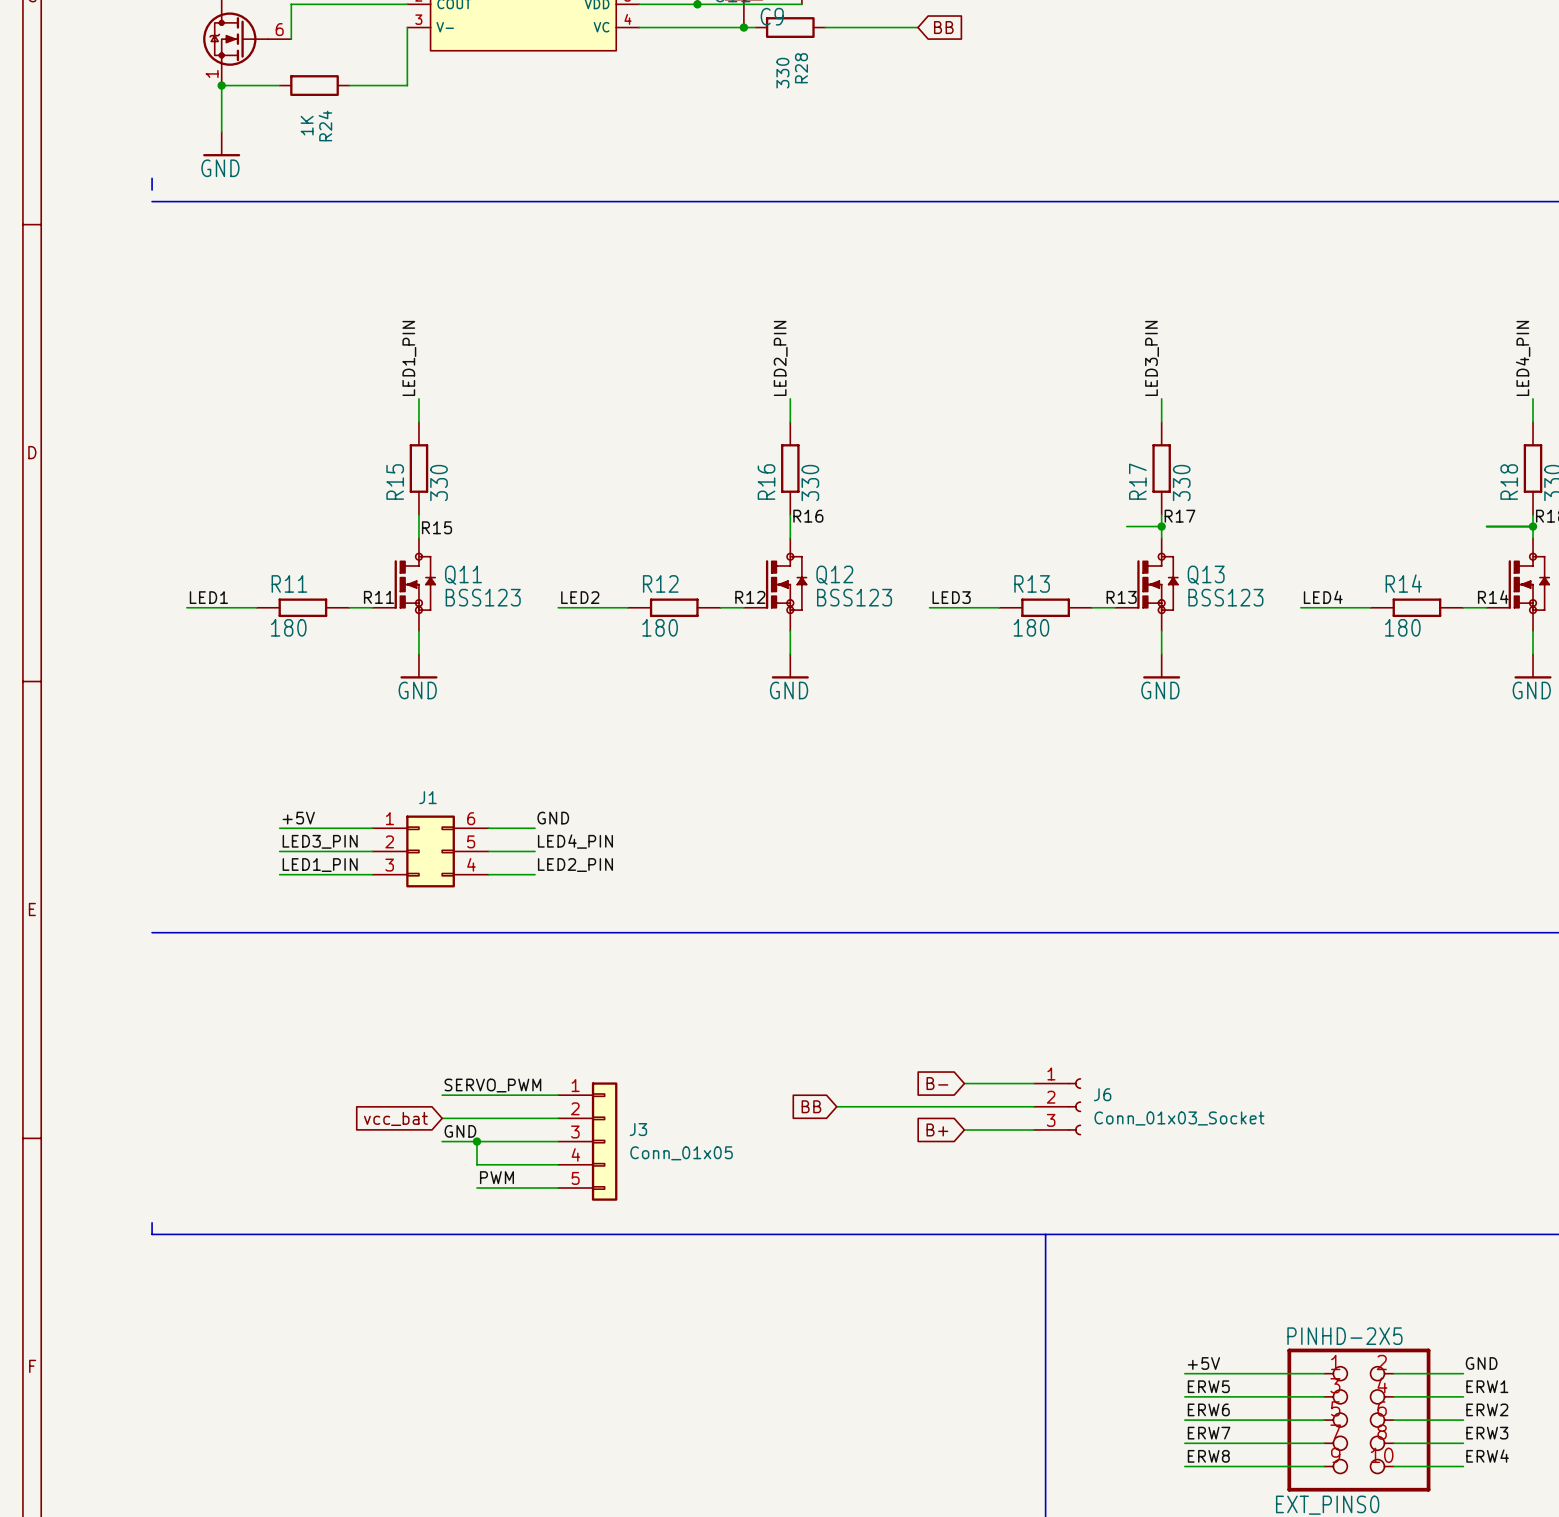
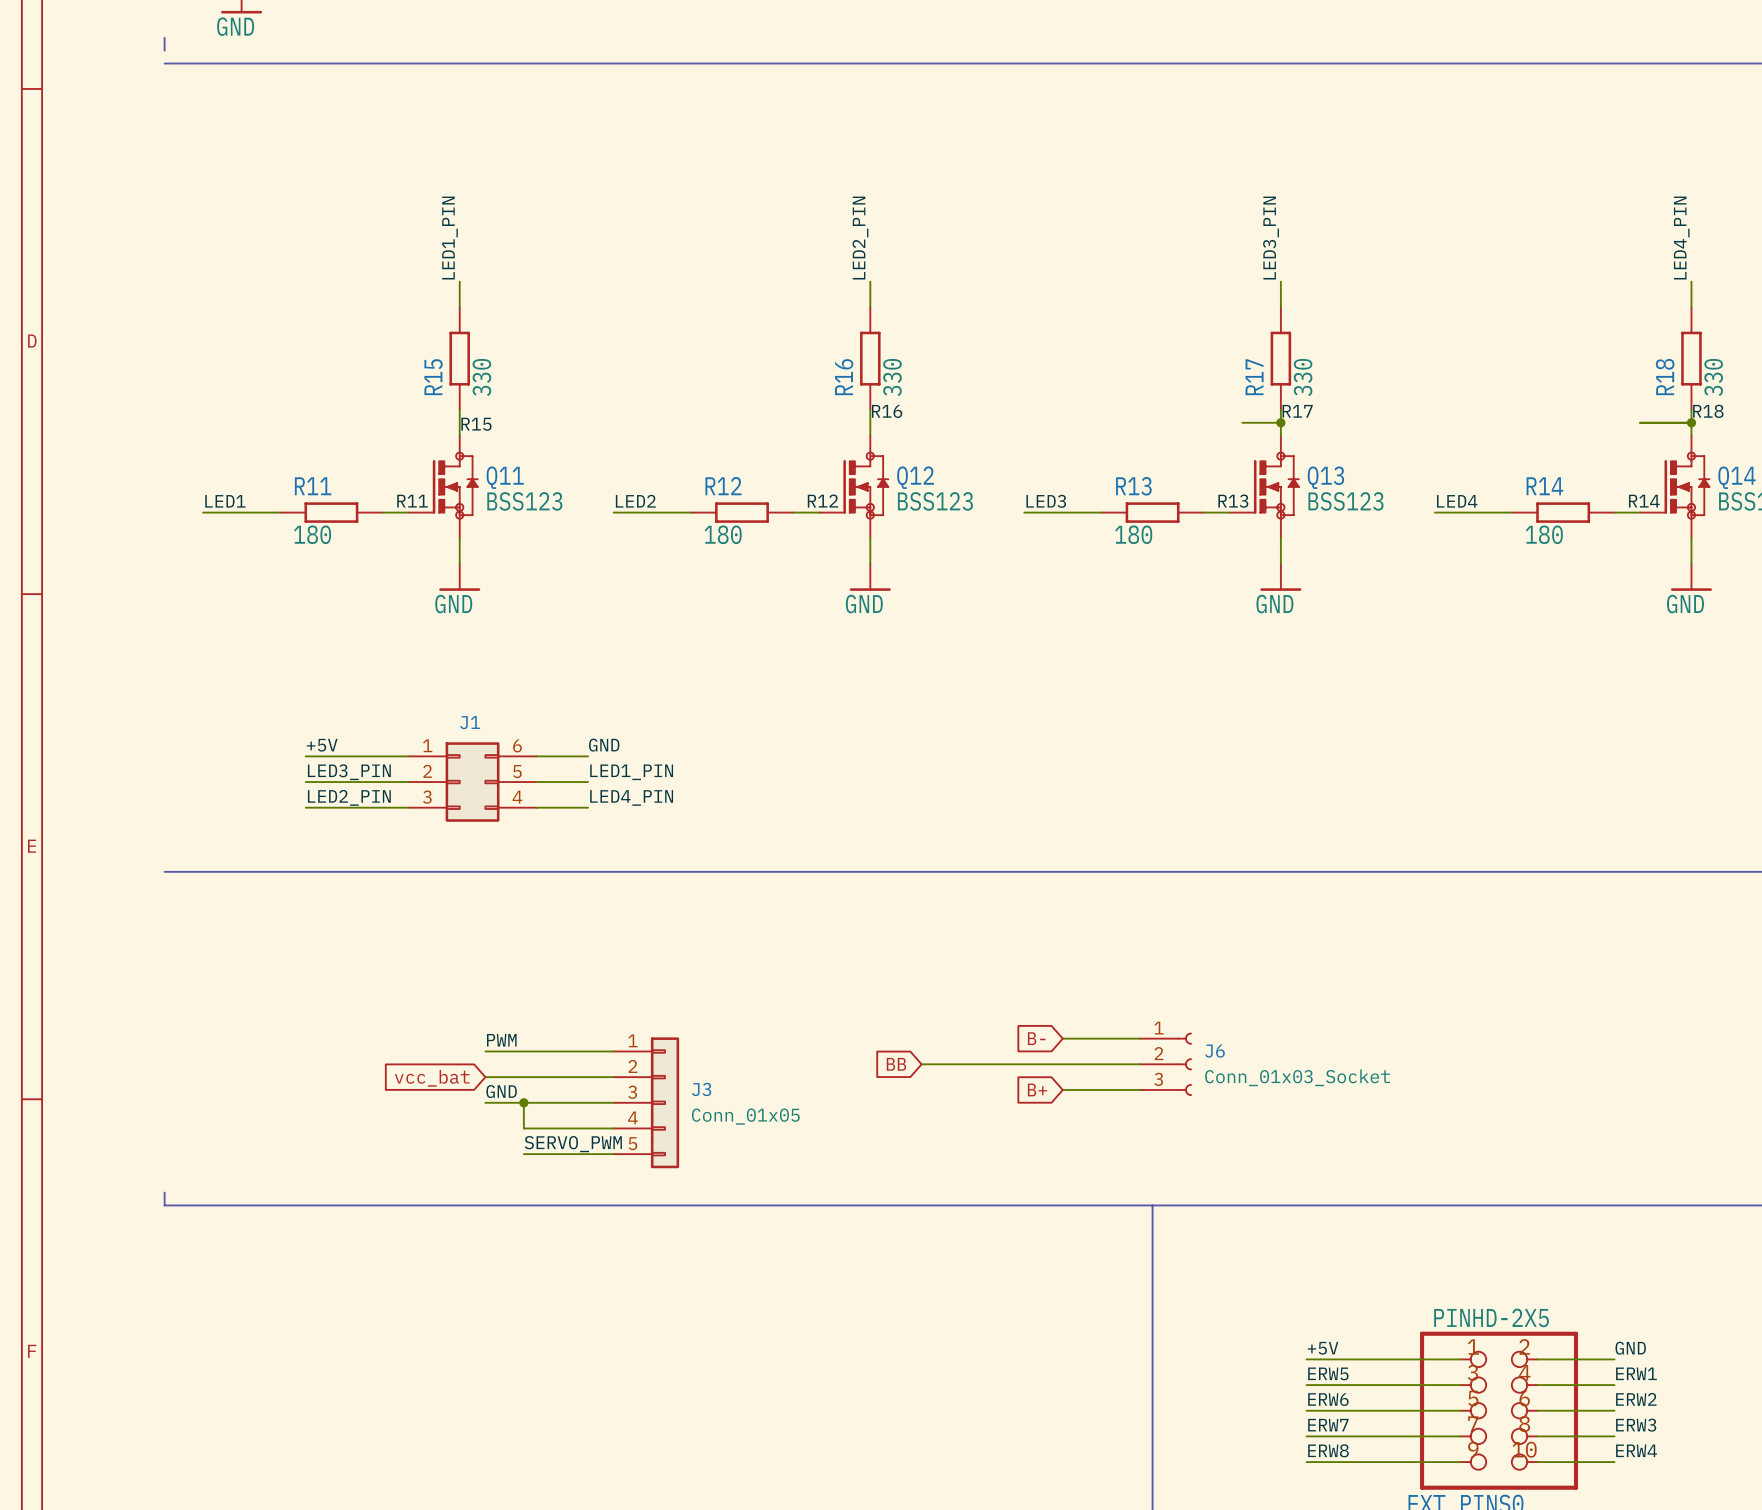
label: LED4_PIN (575, 841) -> LED1_PIN (631, 772)
label: LED1_PIN (320, 865) -> LED2_PIN (349, 797)
label: LED2_PIN (575, 865) -> LED4_PIN (631, 797)
label: SERVO_PWM (492, 1085) -> PWM (501, 1040)
label: PWM (496, 1177) -> SERVO_PWM (573, 1144)

